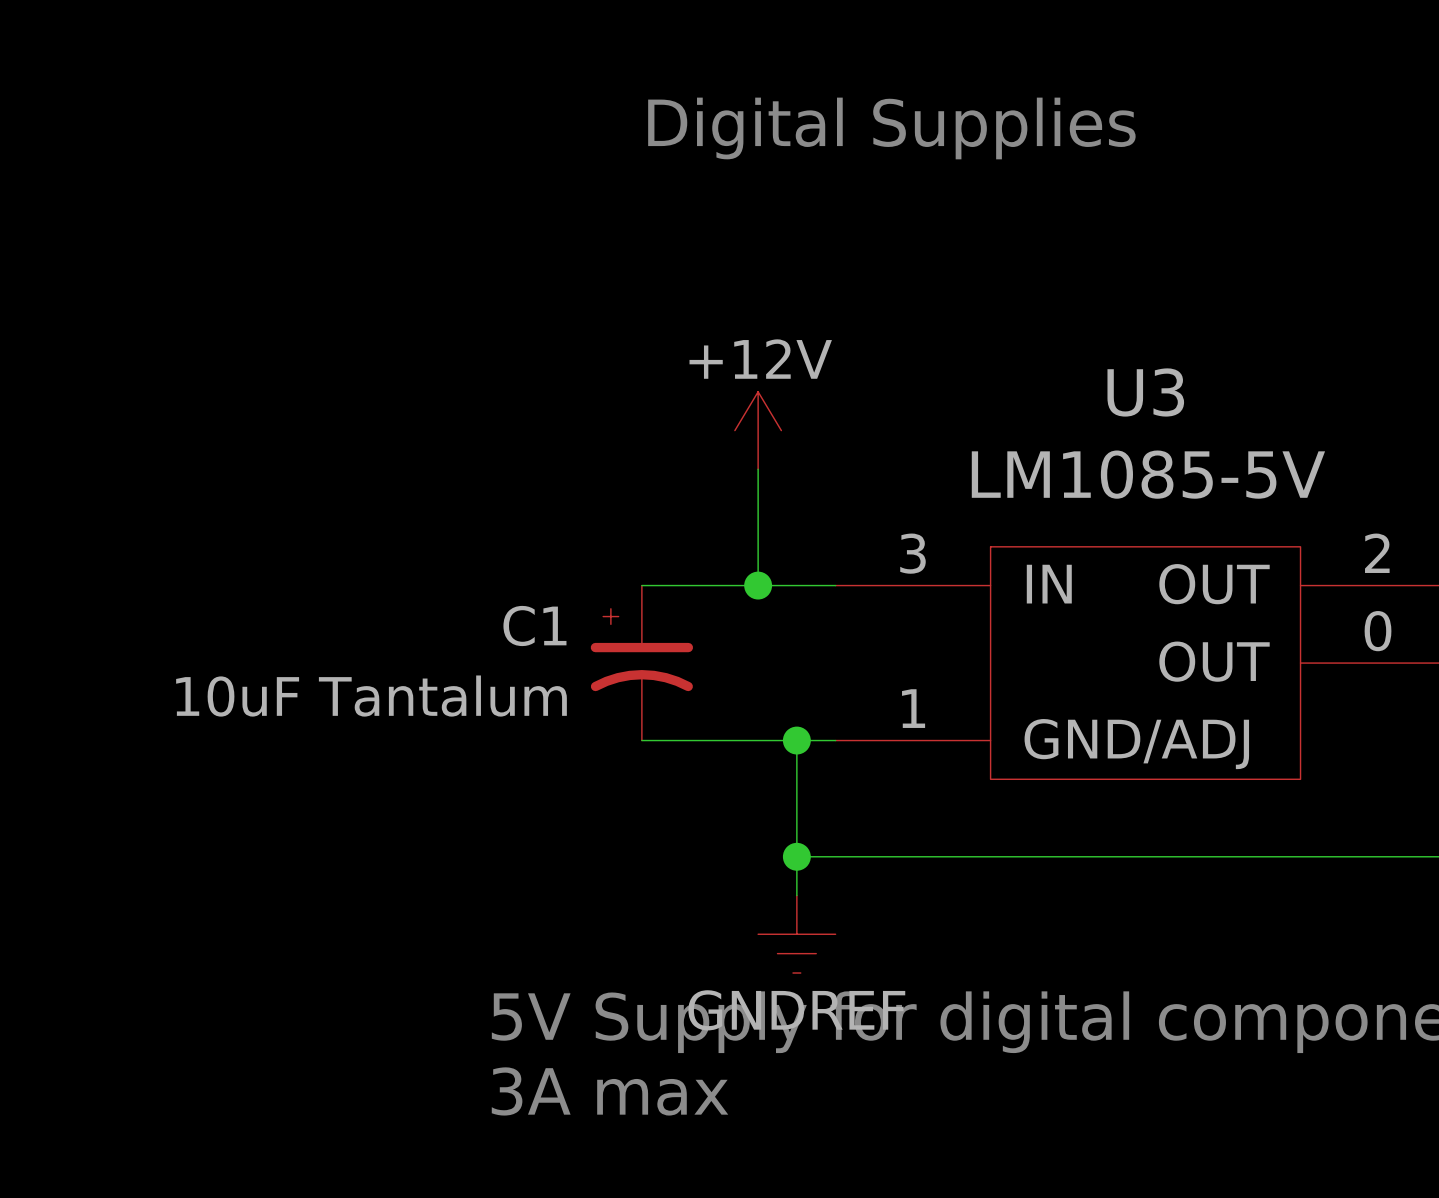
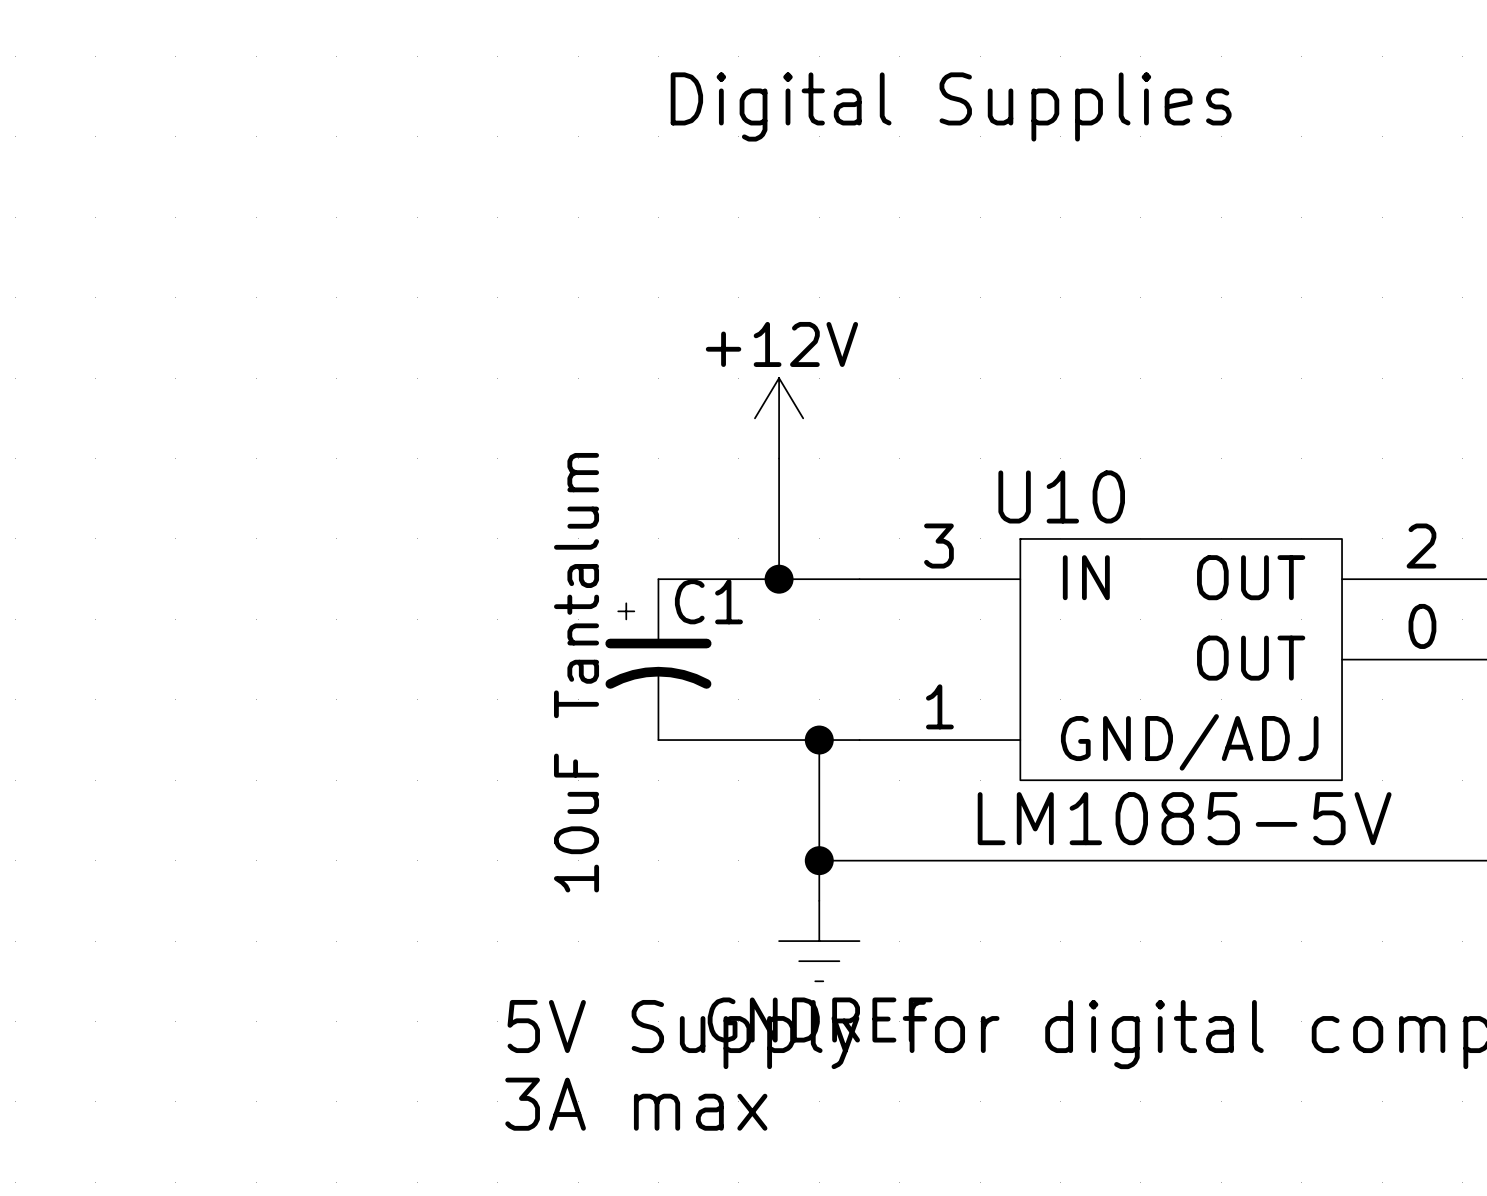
U3 name: U3 (1145, 392) -> U10 (1061, 496)
U3 value position: LM1085-5V (1148, 474) -> LM1085-5V (1184, 818)
C1 name position: C1 (534, 625) -> C1 (708, 601)
C1 value rotation: 0° (371, 696) -> 90° counterclockwise (576, 672)

